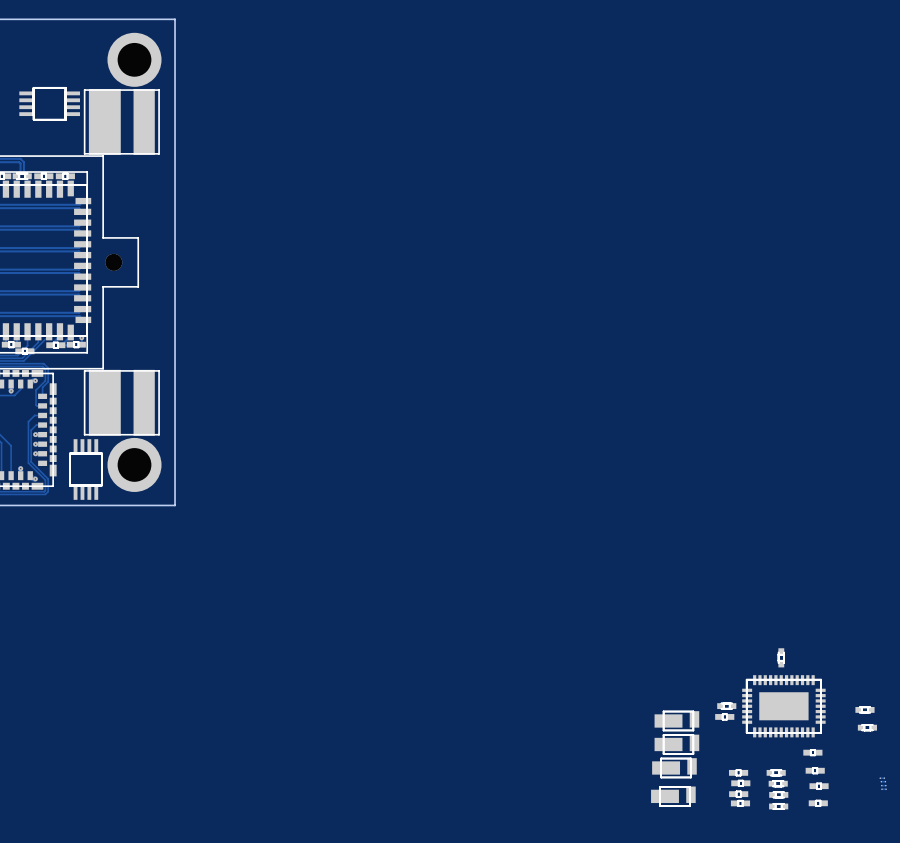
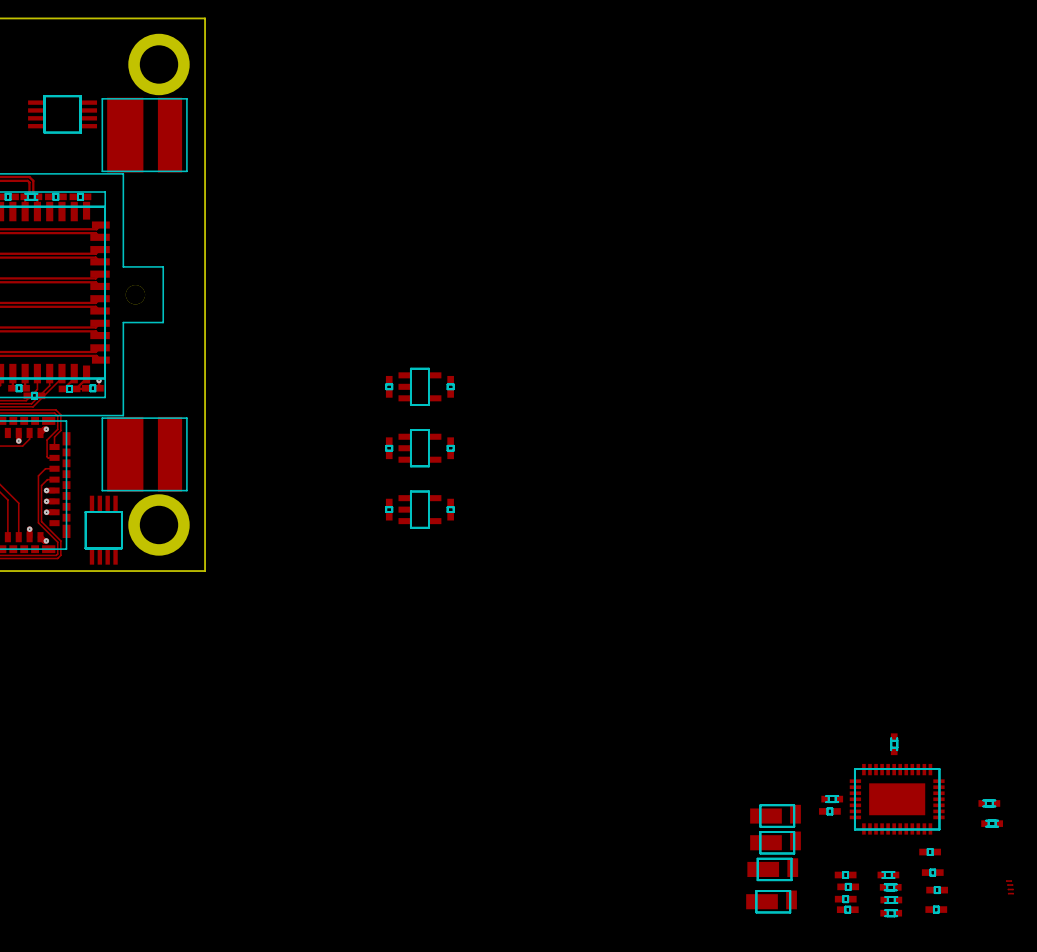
part: none -> (389, 386)
part: none -> (419, 386)
part: none -> (450, 386)
part: none -> (389, 448)
part: none -> (419, 448)
part: none -> (450, 448)
part: none -> (389, 509)
part: none -> (419, 509)
part: none -> (450, 509)

